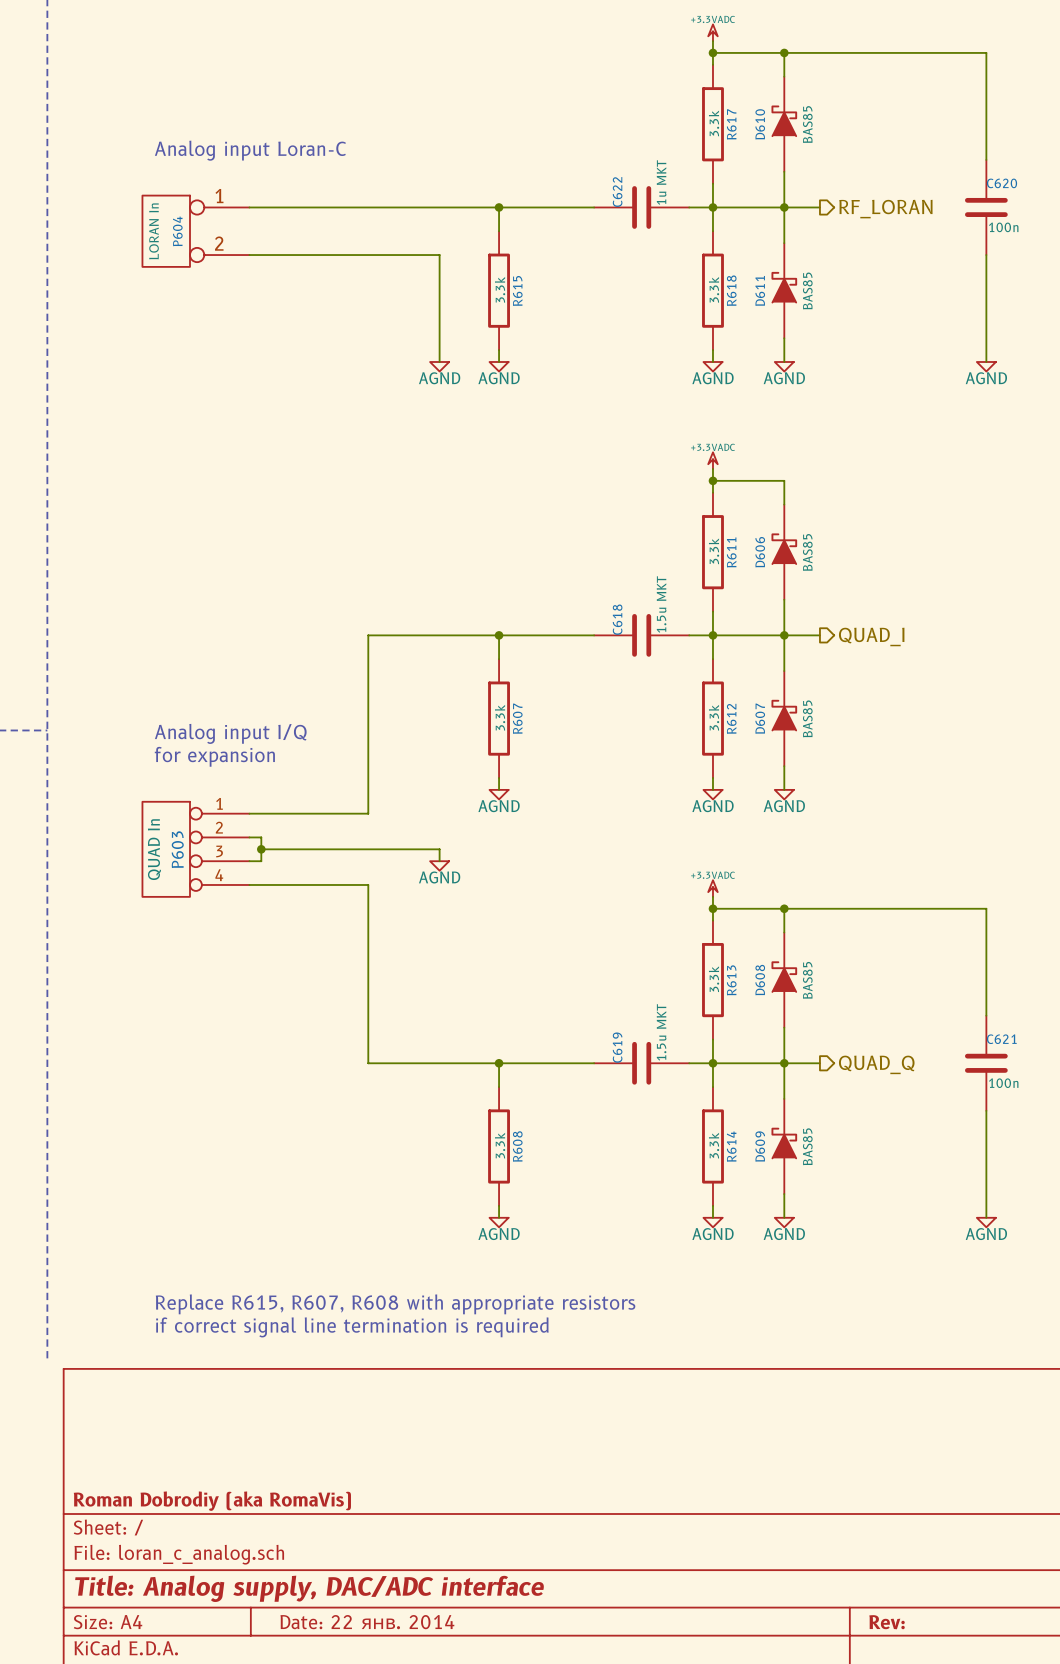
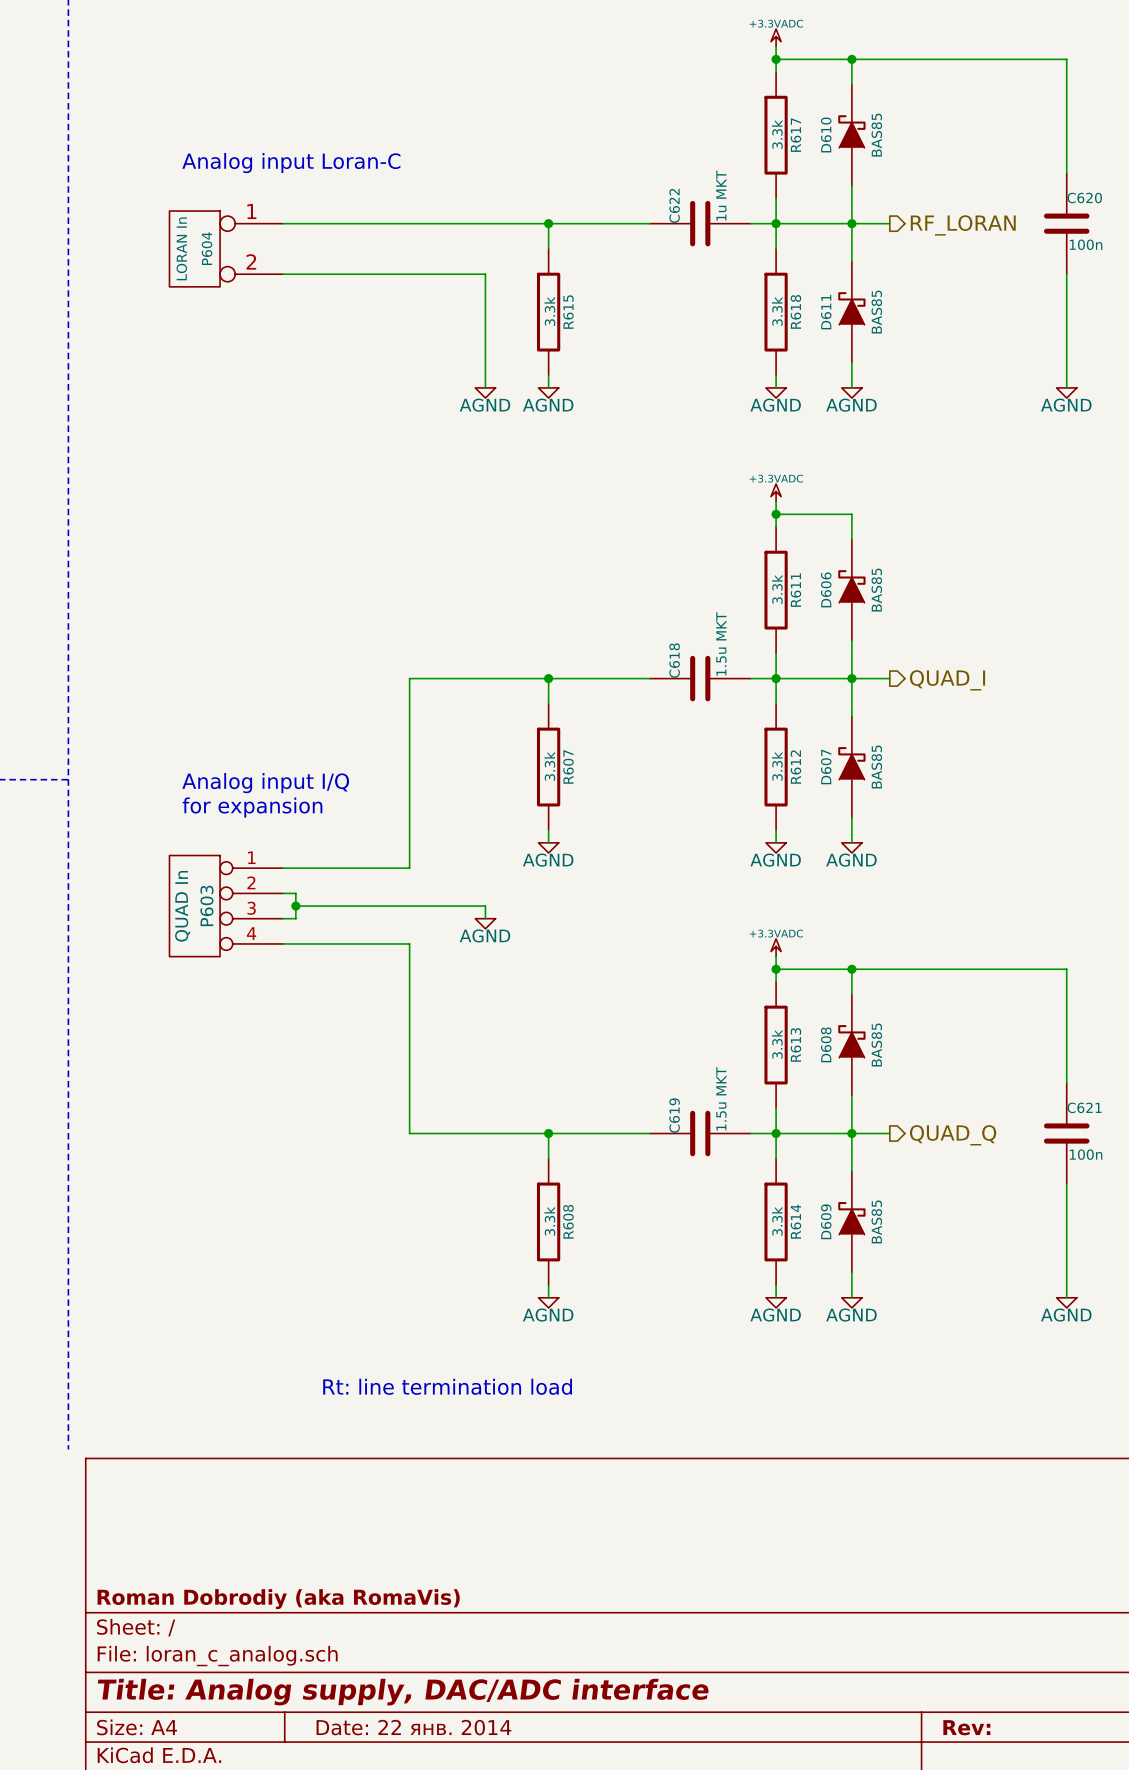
text: none -> Rt: line termination load (447, 1386)
text: Replace R615, R607, R608 with appropriate resistors (395, 1304) -> none
text: if correct signal line termination is required (352, 1327) -> none

